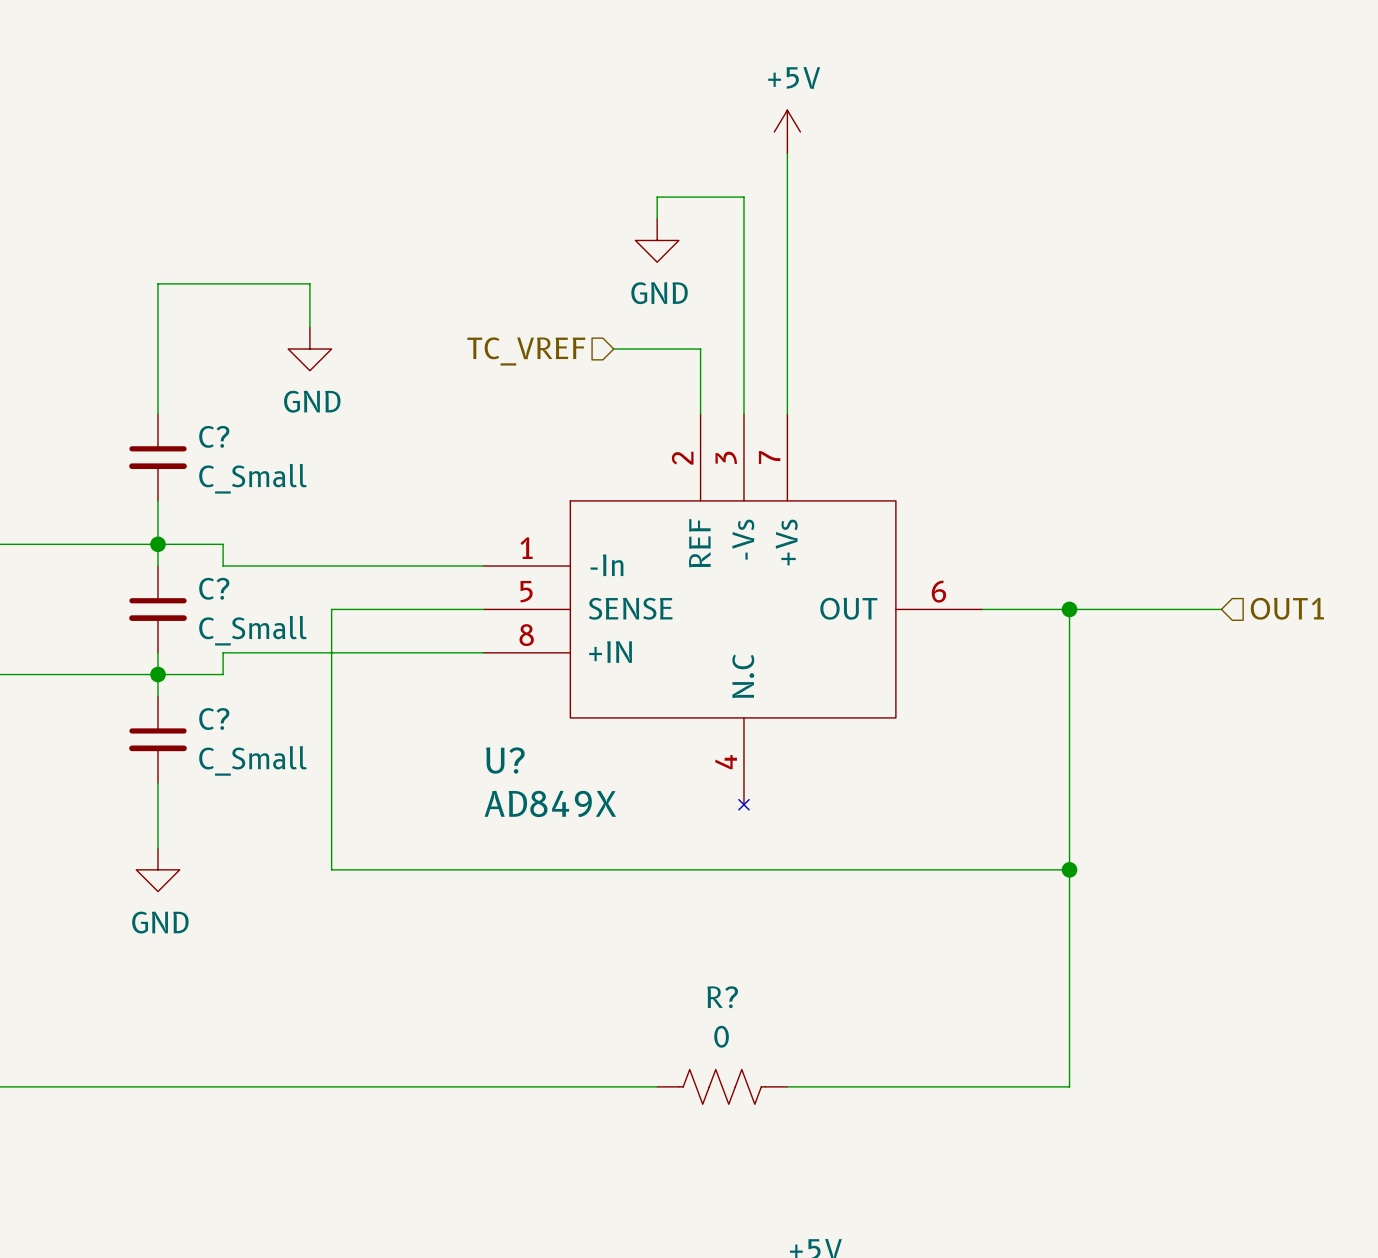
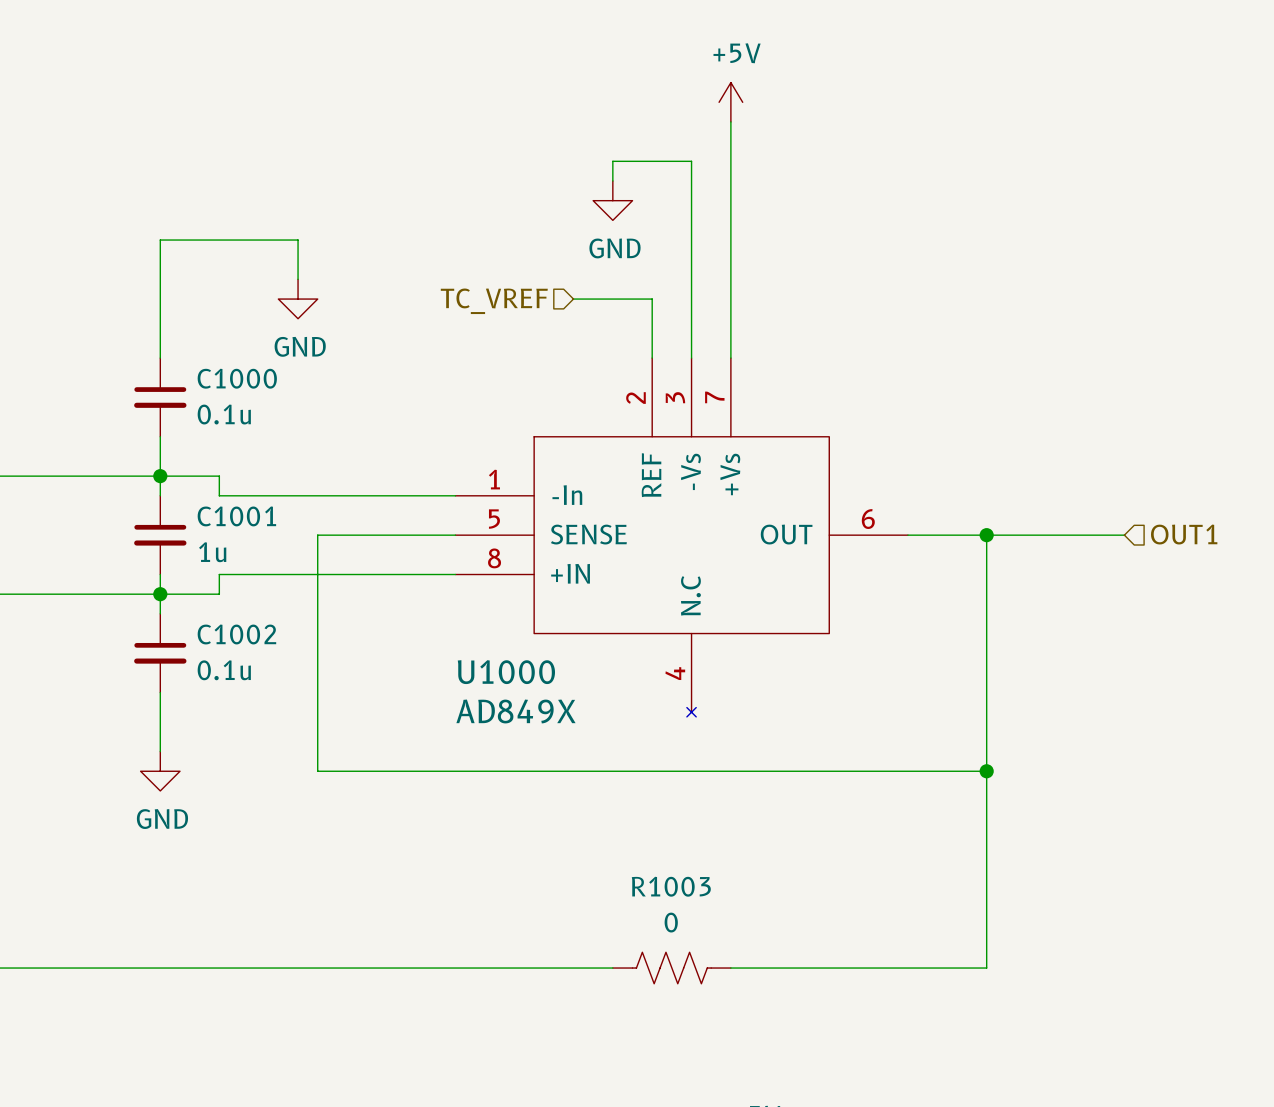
C? name: C? (214, 436) -> C1000 (237, 378)
C? value: C_Small (252, 478) -> 0.1u (224, 414)
C? name: C? (214, 588) -> C1001 (236, 516)
C? value: C_Small (252, 630) -> 1u (212, 552)
C? name: C? (214, 719) -> C1002 (236, 634)
C? value: C_Small (252, 760) -> 0.1u (224, 670)
U? name: U? (505, 760) -> U1000 (506, 672)
R? name: R? (722, 997) -> R1003 (671, 886)

